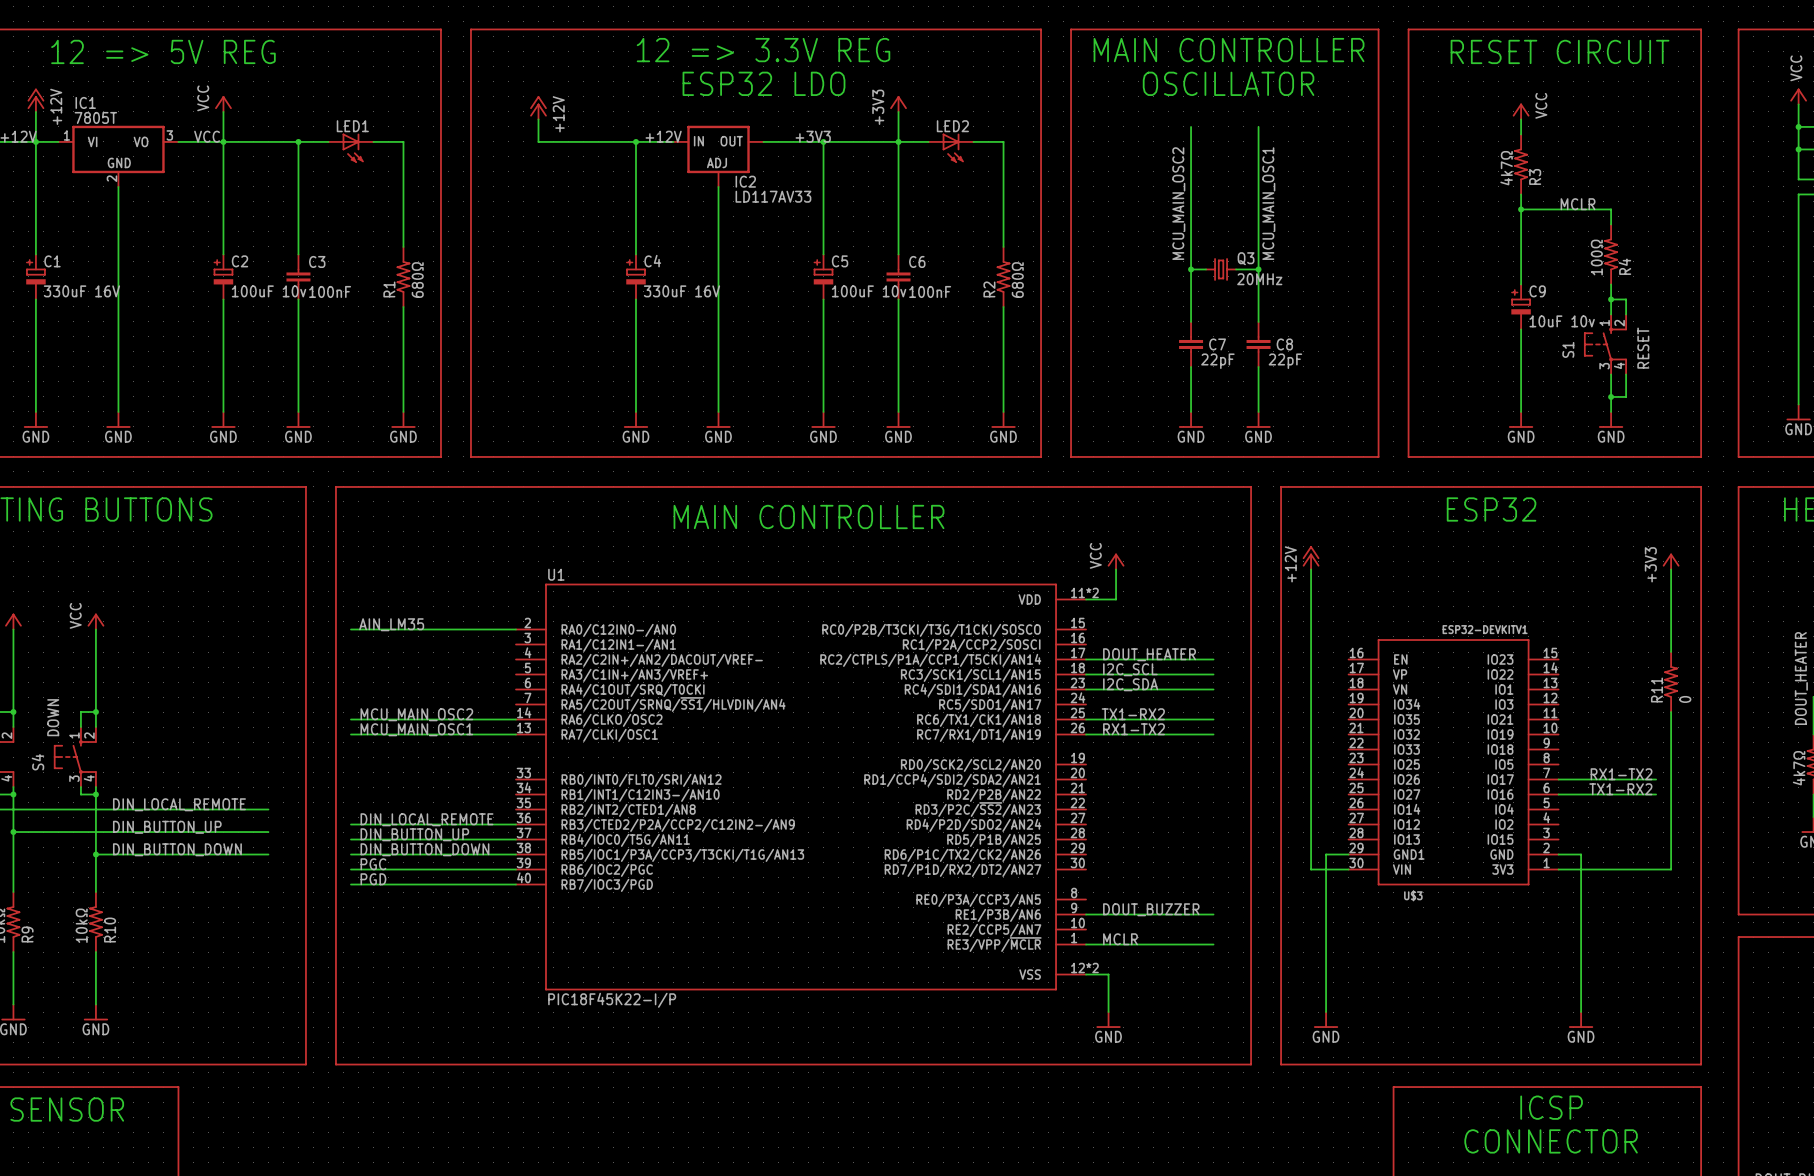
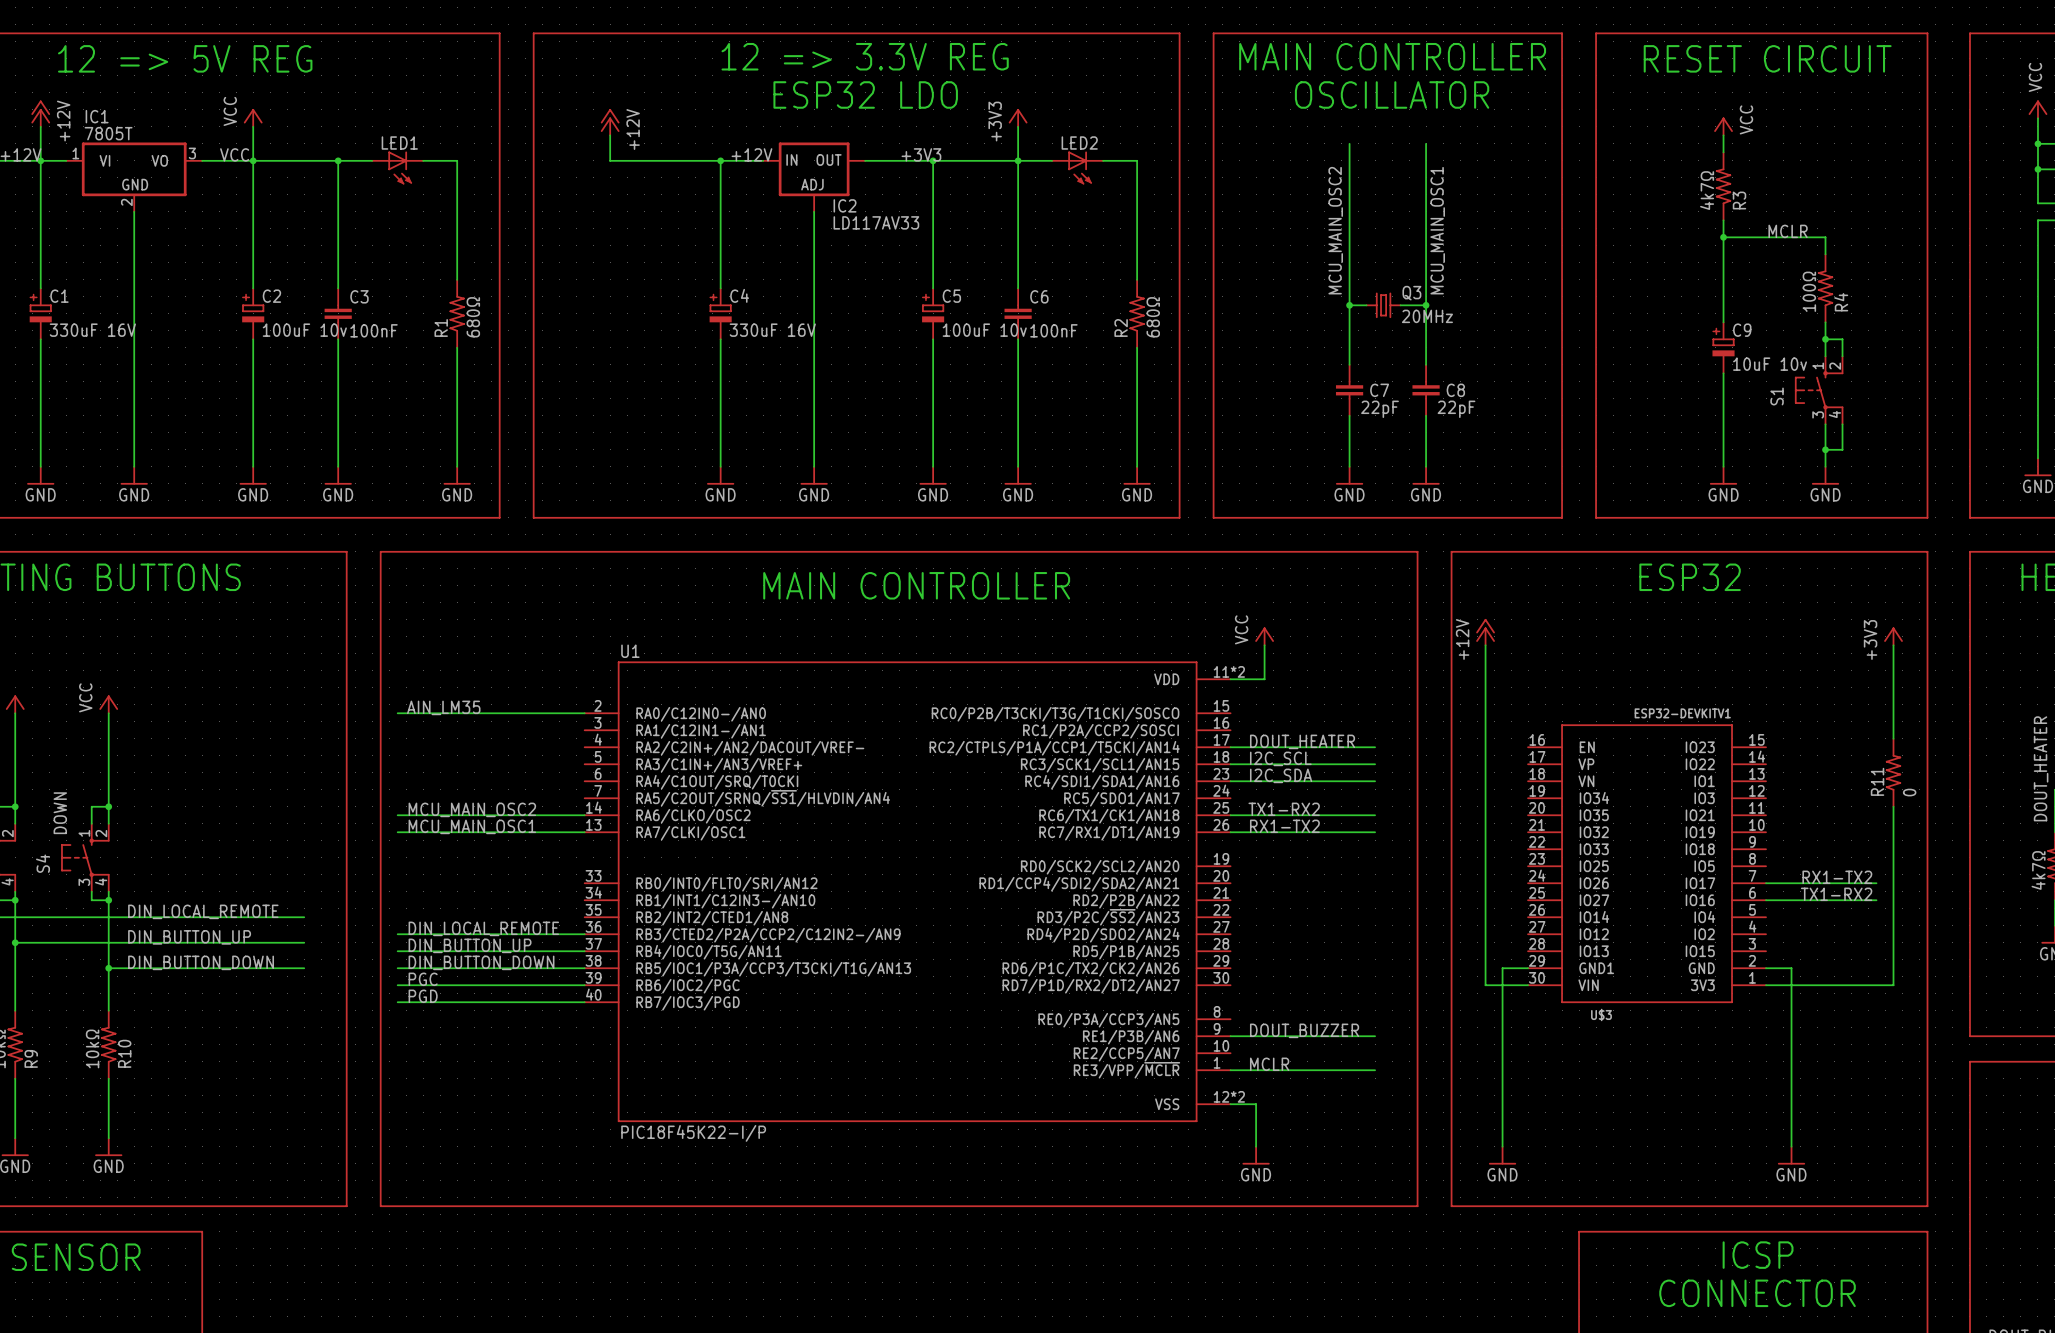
S1 value: RESET (1643, 348) -> none

